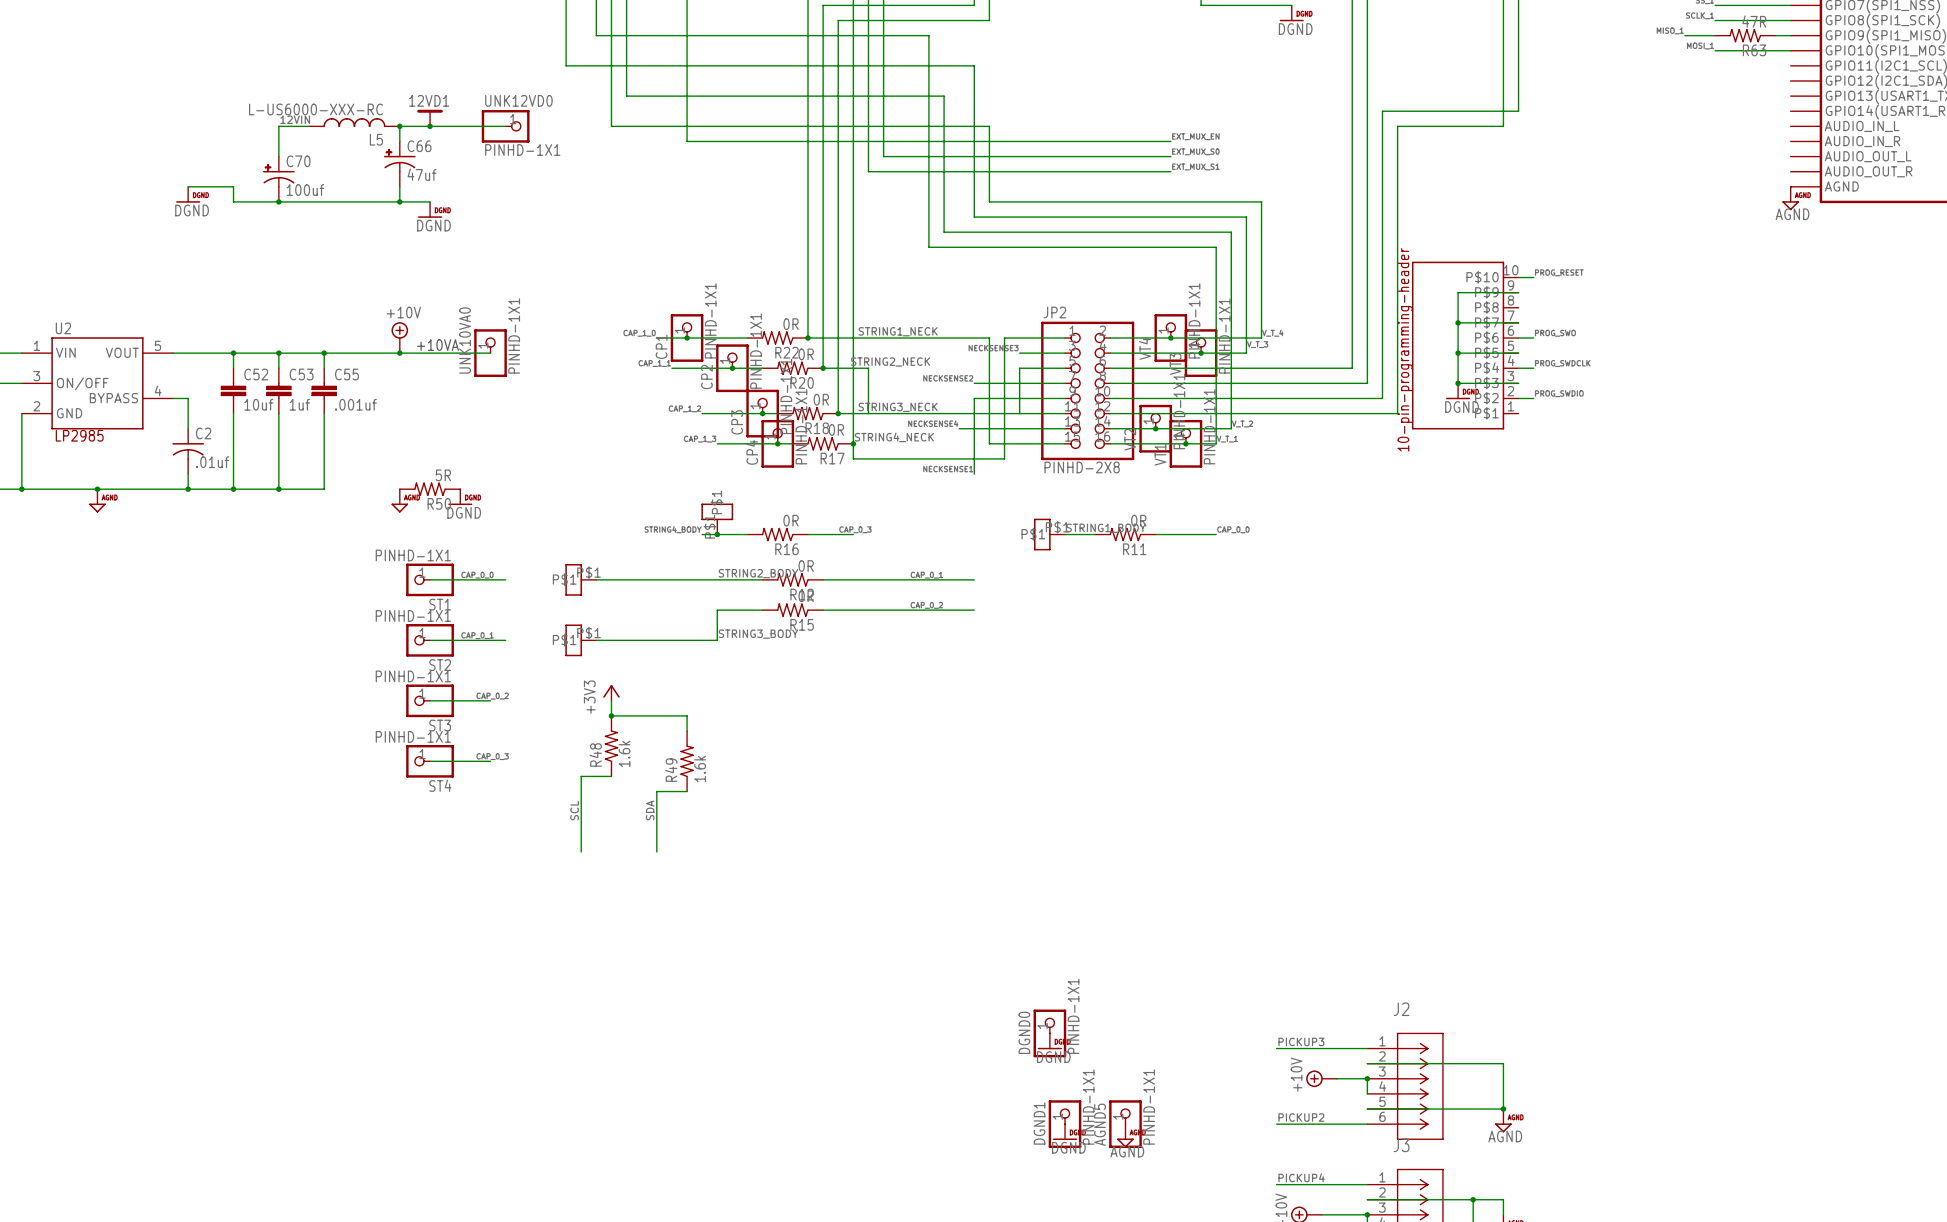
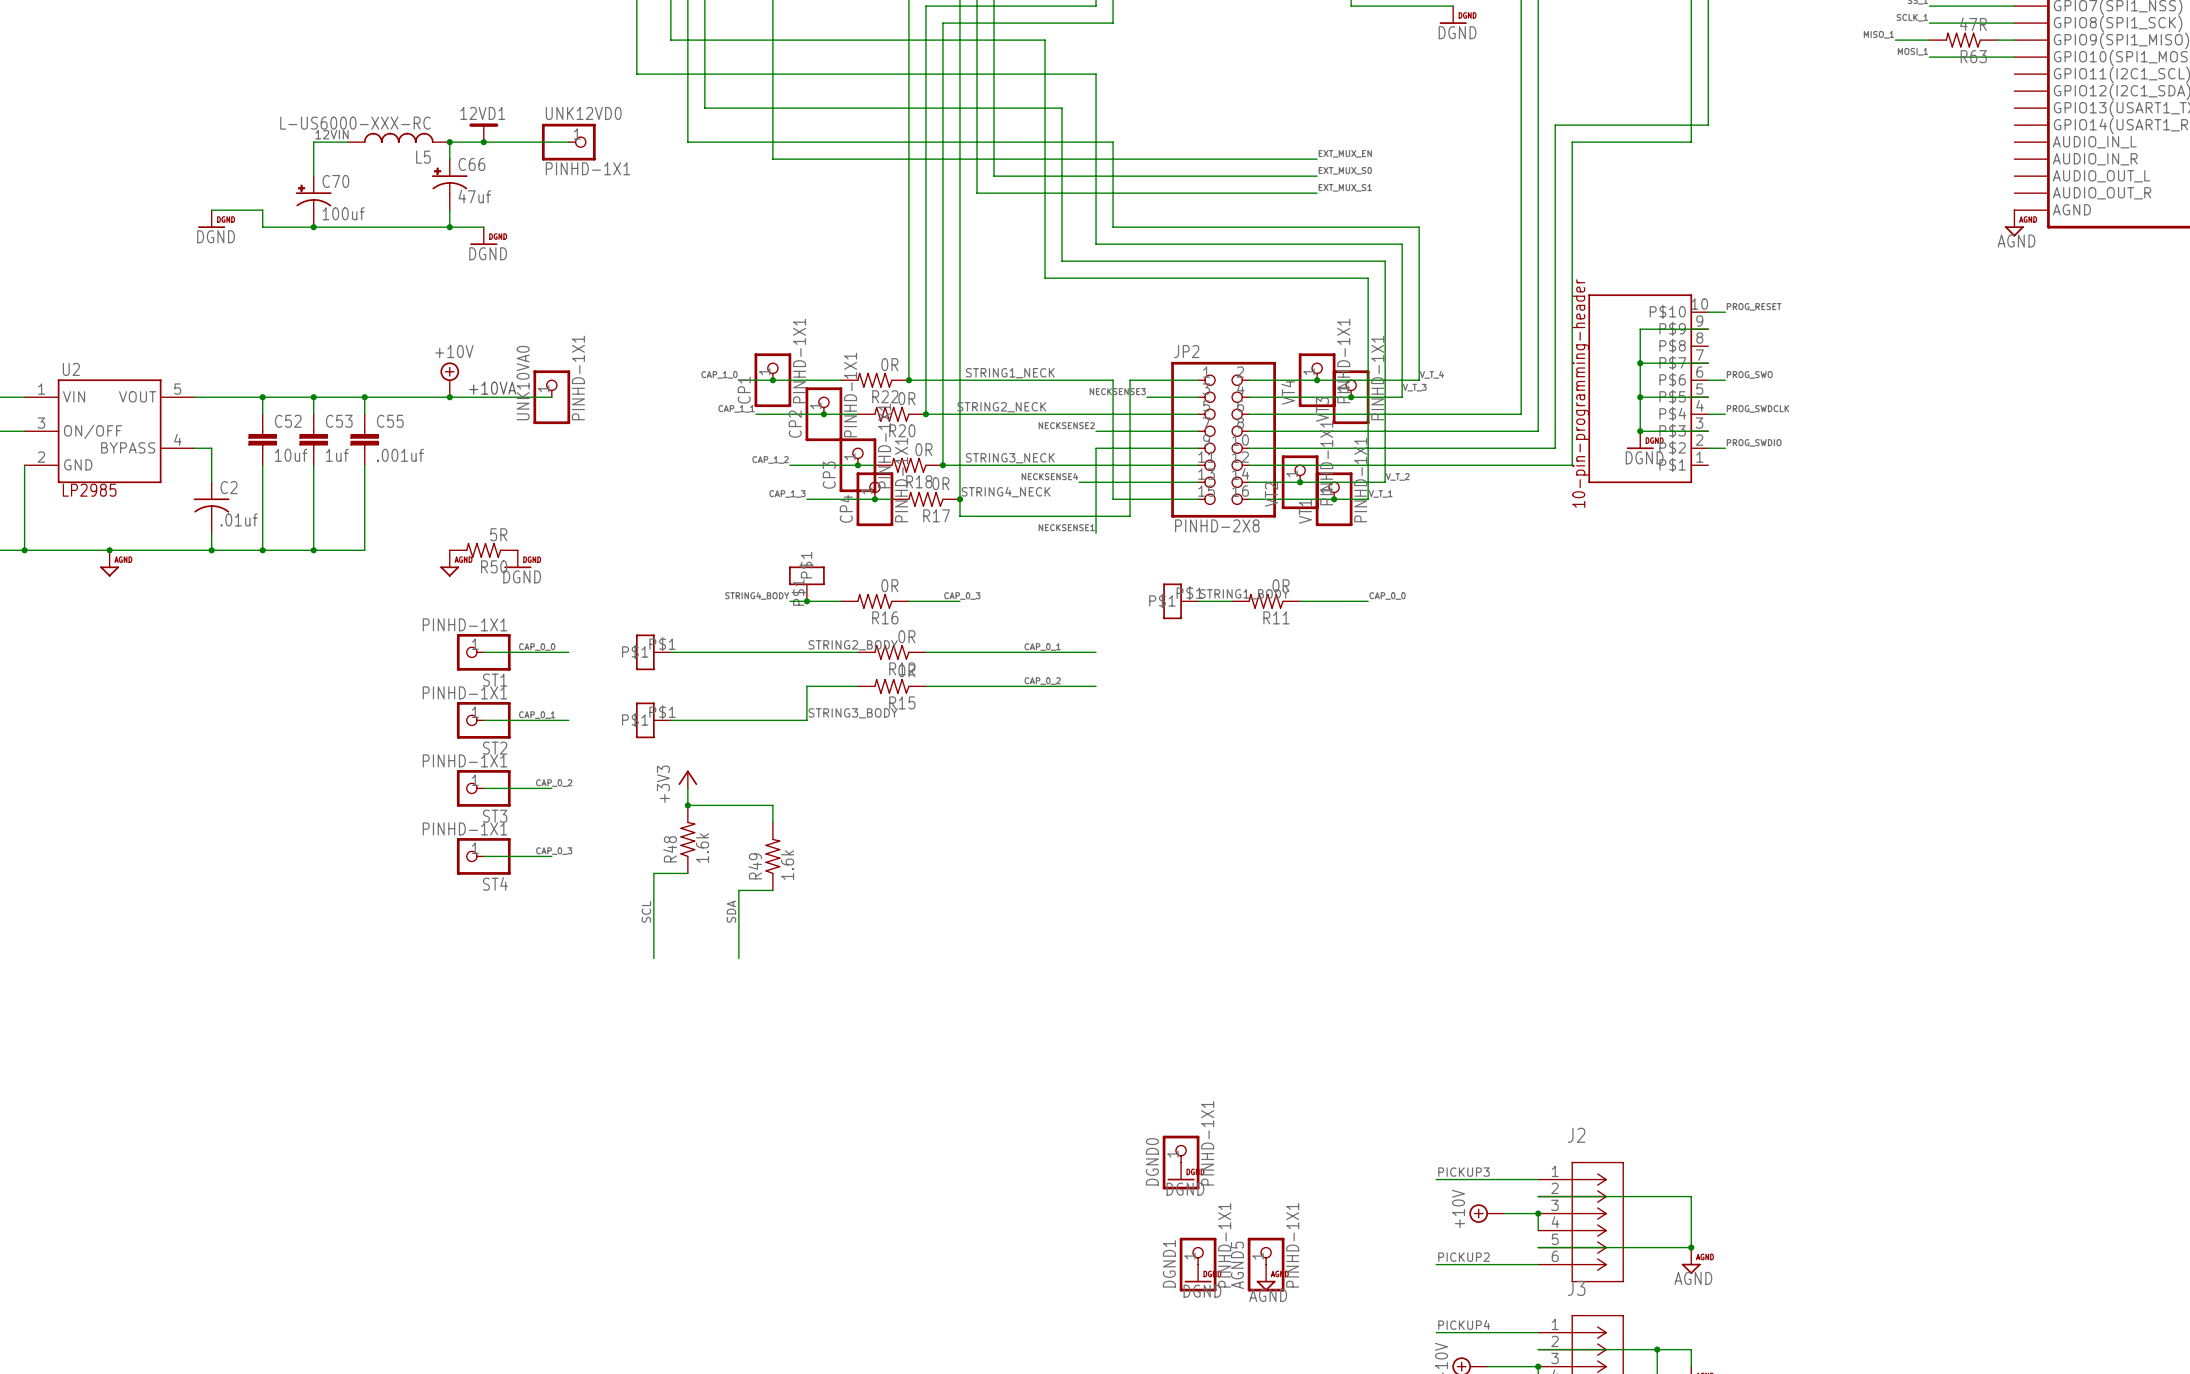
wire: (868, 368) (868, 413) -> (976, 414) (1147, 414)
wire: (1019, 368) (1019, 413) -> none

